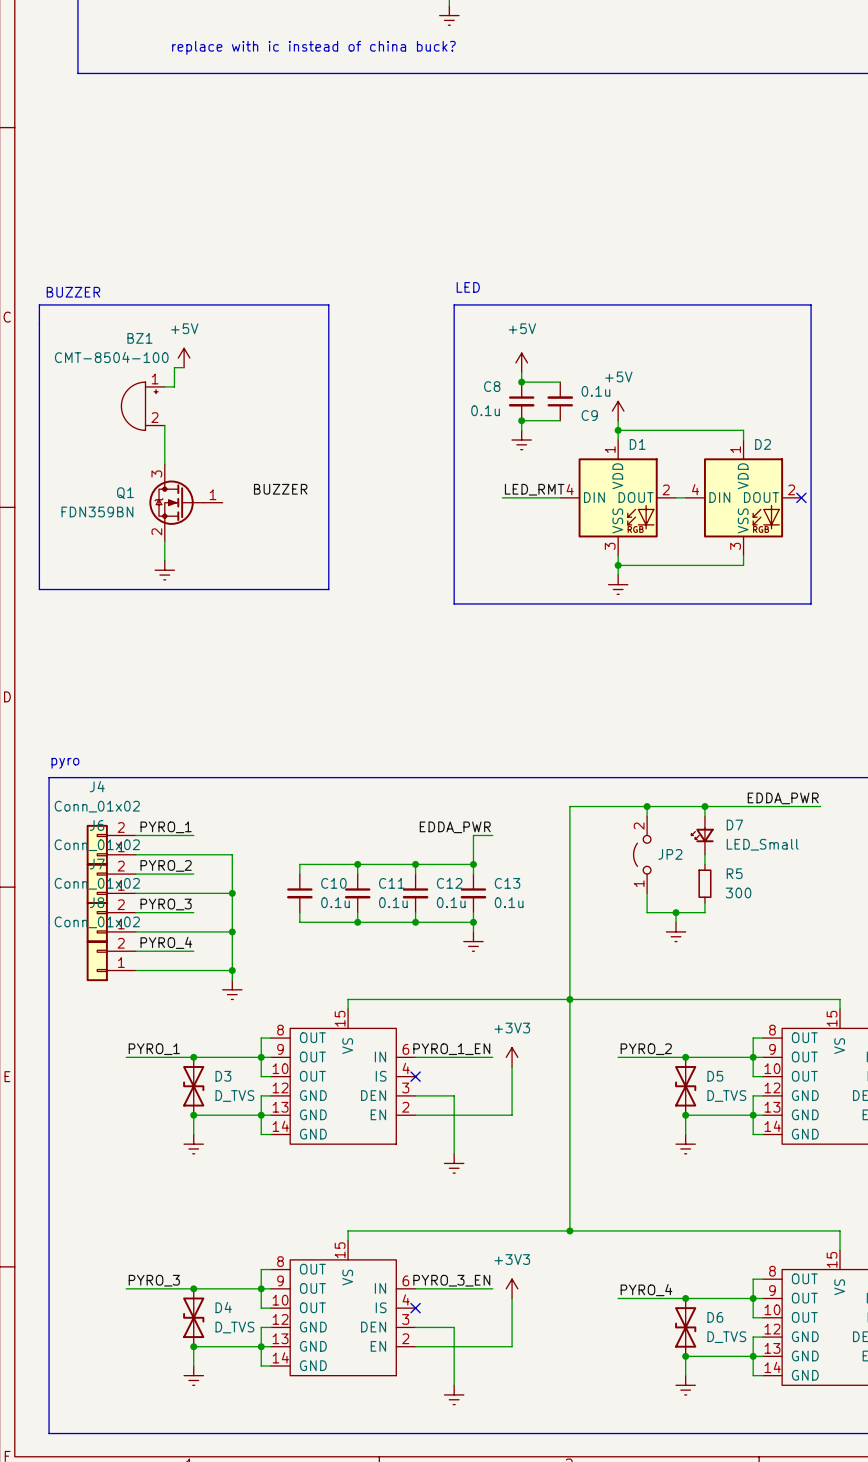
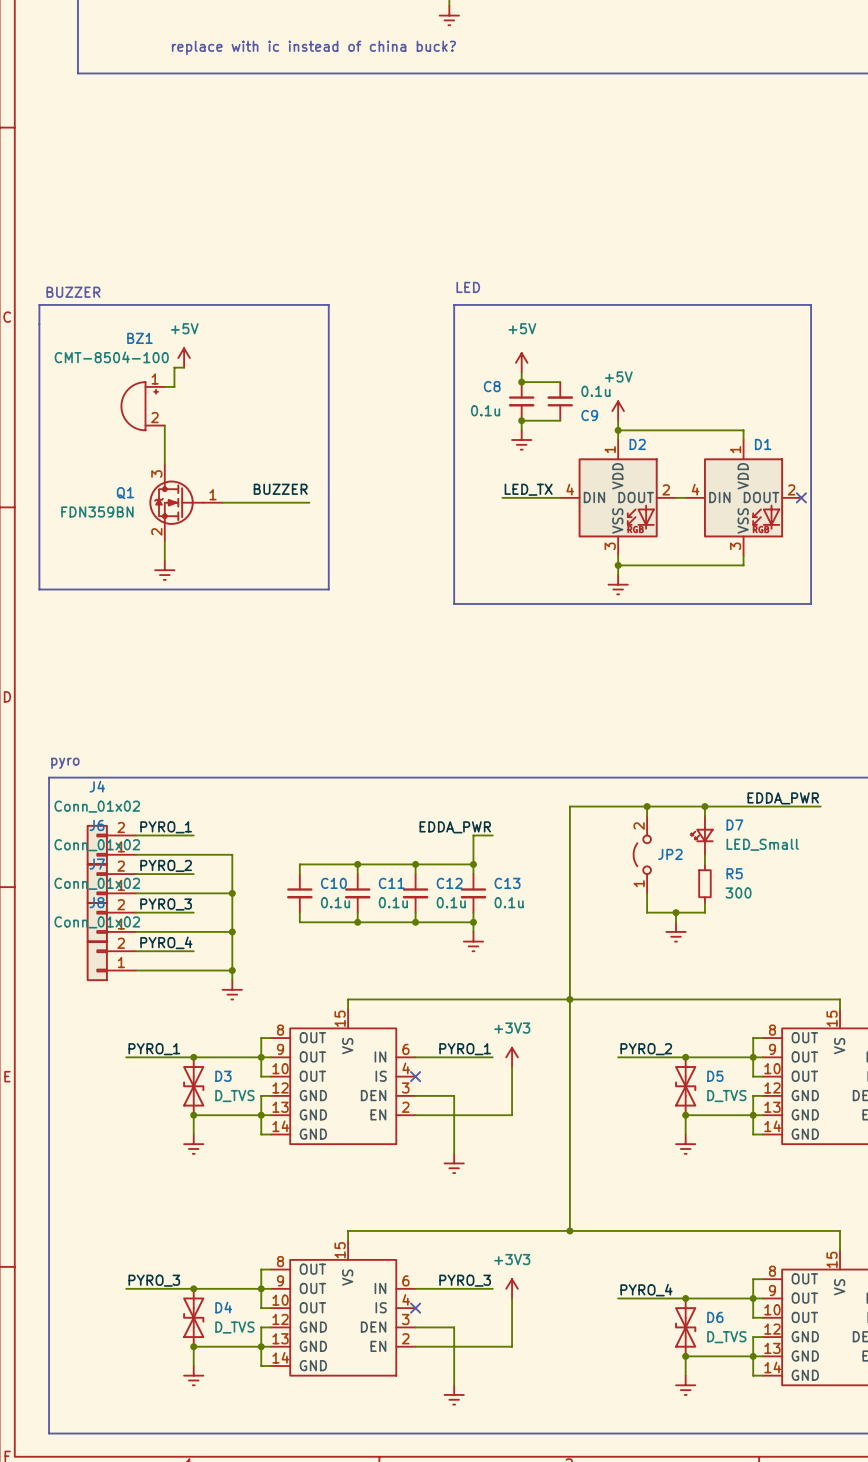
D1 name: D1 (637, 444) -> D2 (637, 444)
D2 name: D2 (763, 444) -> D1 (763, 444)
label: LED_RMT (534, 489) -> LED_TX (528, 489)
wire: none -> (222, 502) (309, 502)
label: PYRO_1_EN (451, 1049) -> PYRO_1 (465, 1049)
label: PYRO_3_EN (451, 1280) -> PYRO_3 (465, 1280)

